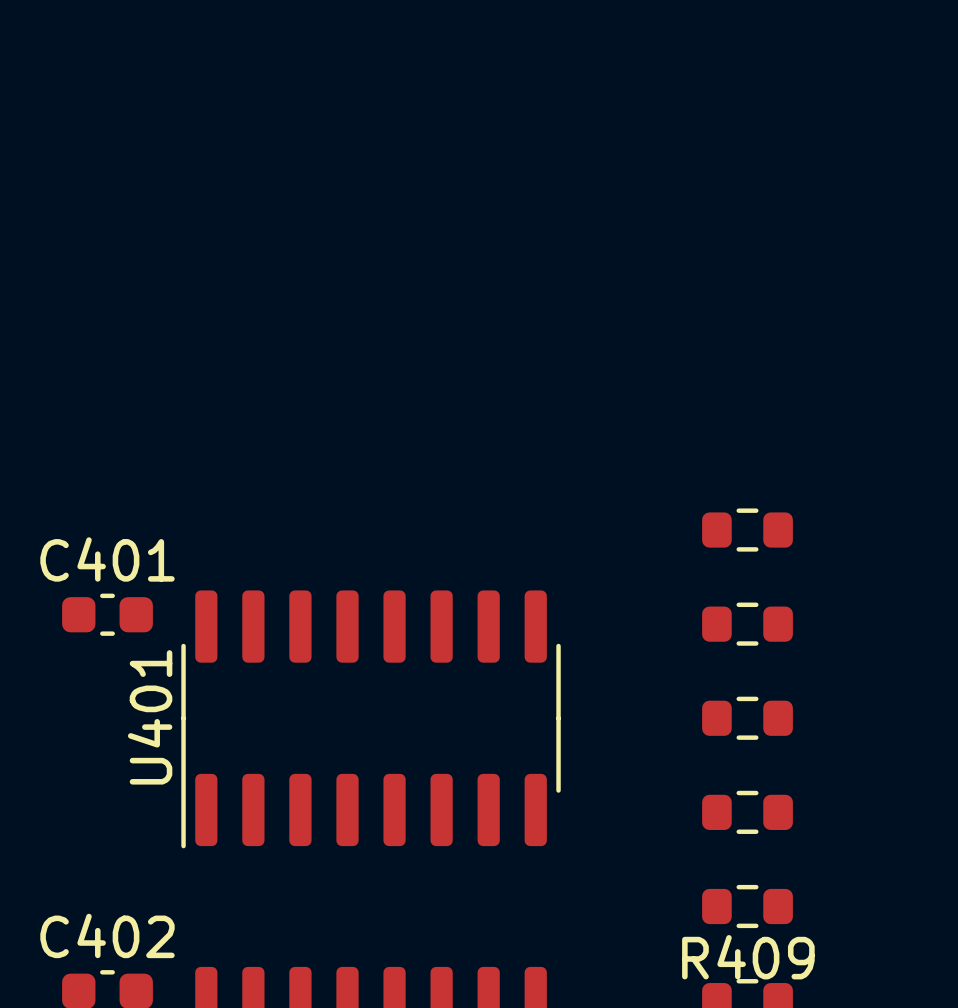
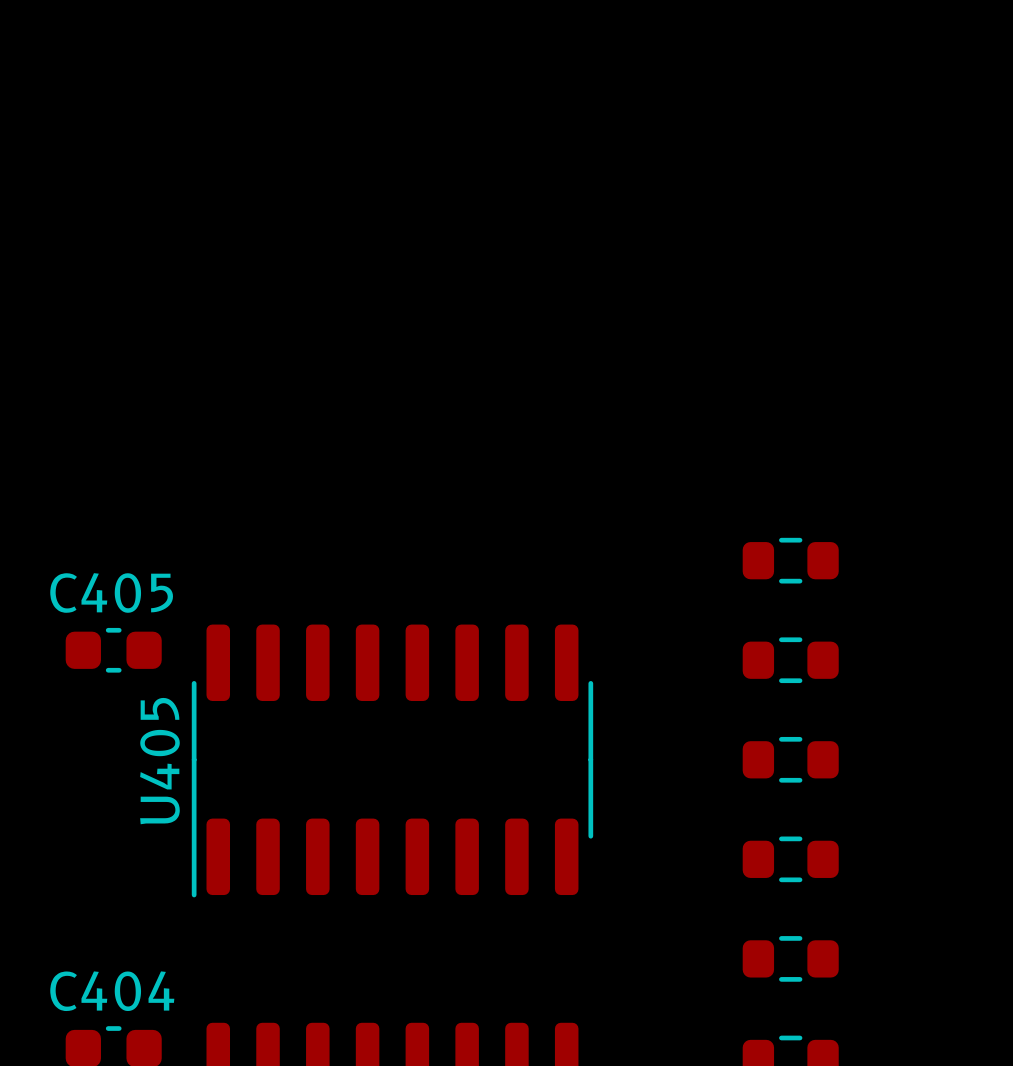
C401 name: C401 (107, 559) -> C405 (111, 592)
U401 name: U401 (150, 717) -> U405 (159, 761)
C402 name: C402 (107, 935) -> C404 (112, 991)
R409 name: R409 (748, 957) -> none

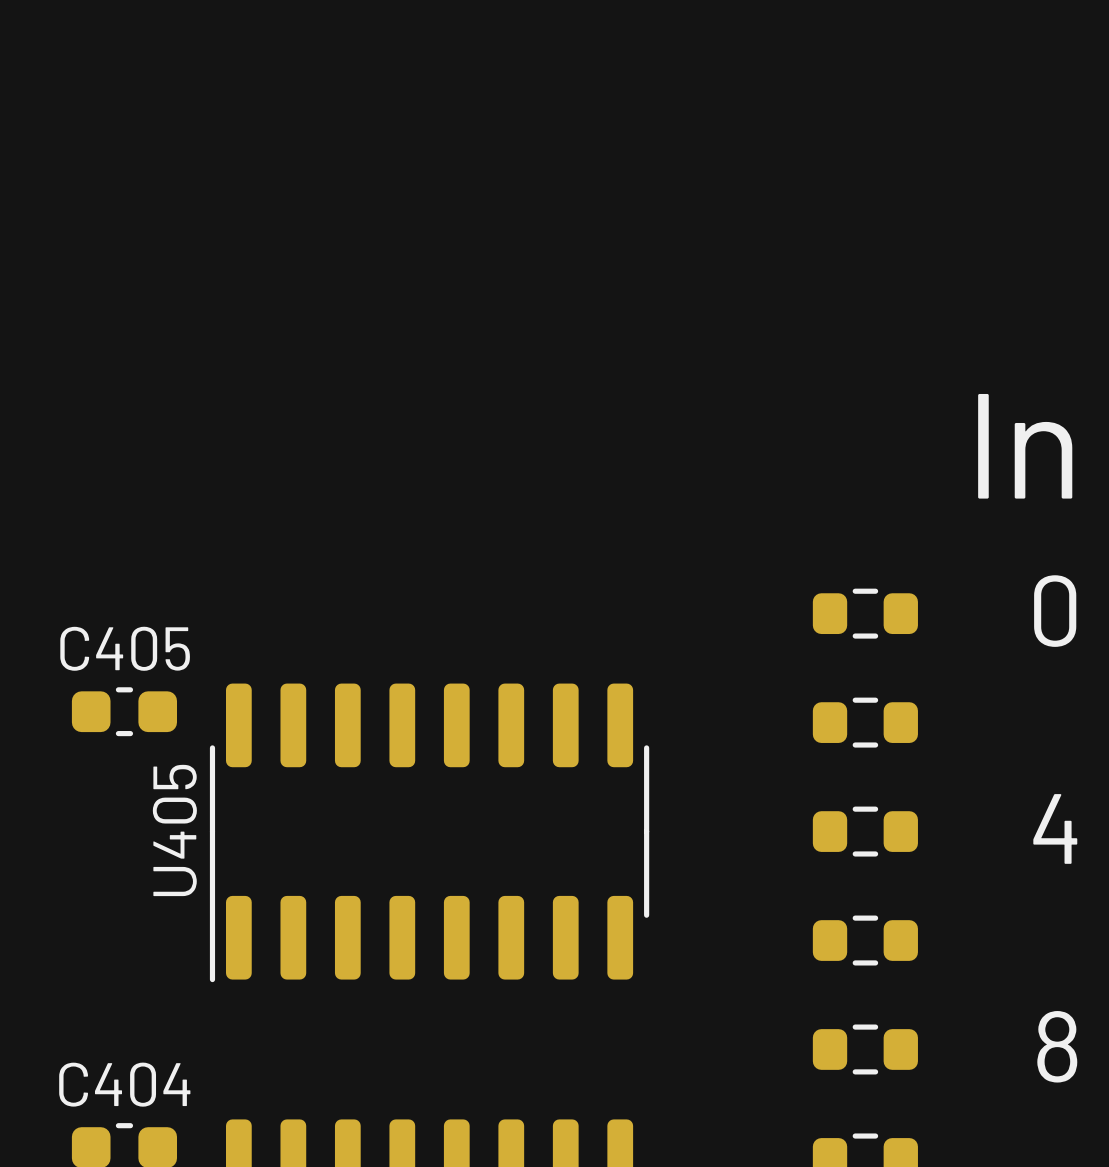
text: none -> In (1025, 446)
text: none -> 0 (1055, 611)
text: none -> 4 (1055, 828)
text: none -> 8 (1057, 1046)

